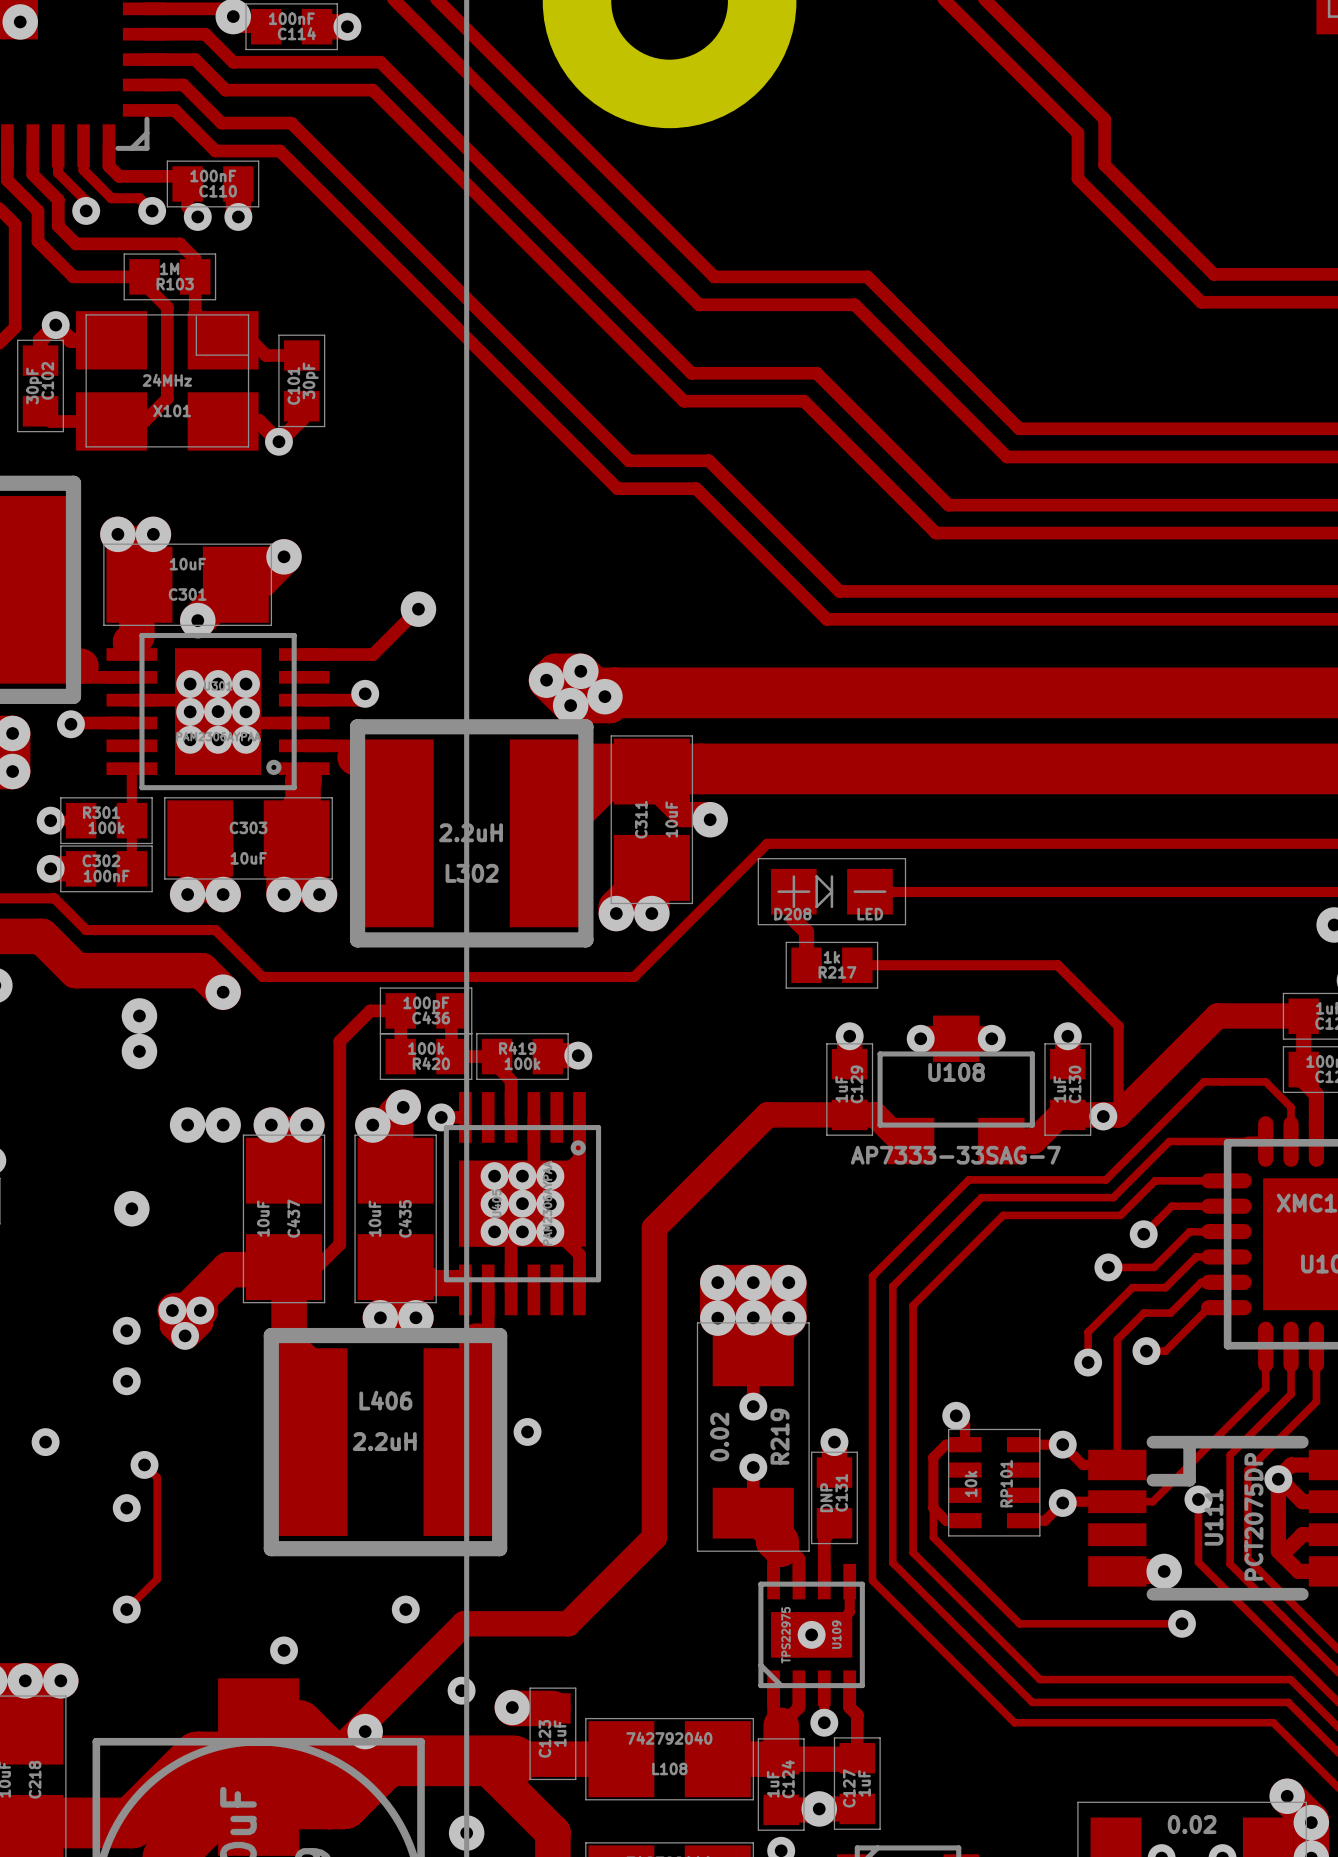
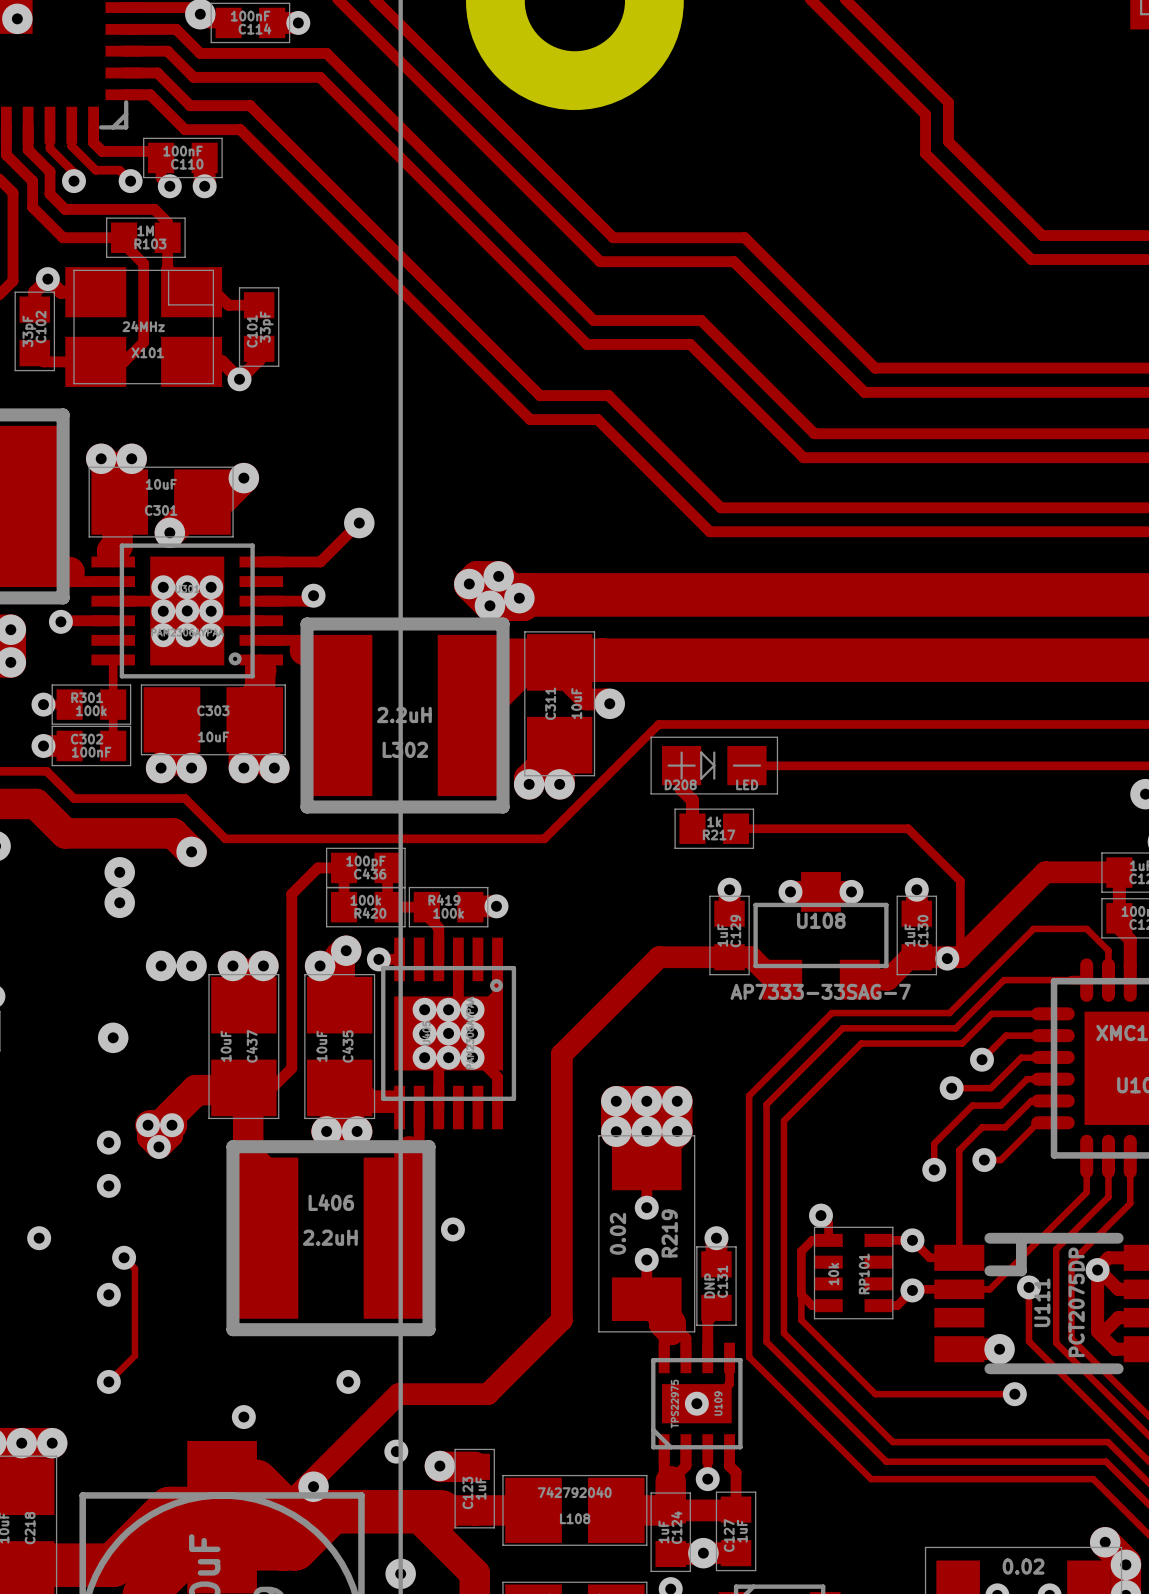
C101 value: 30pF (310, 380) -> 33pF (266, 327)
C102 value: 30pF (34, 385) -> 33pF (29, 331)

